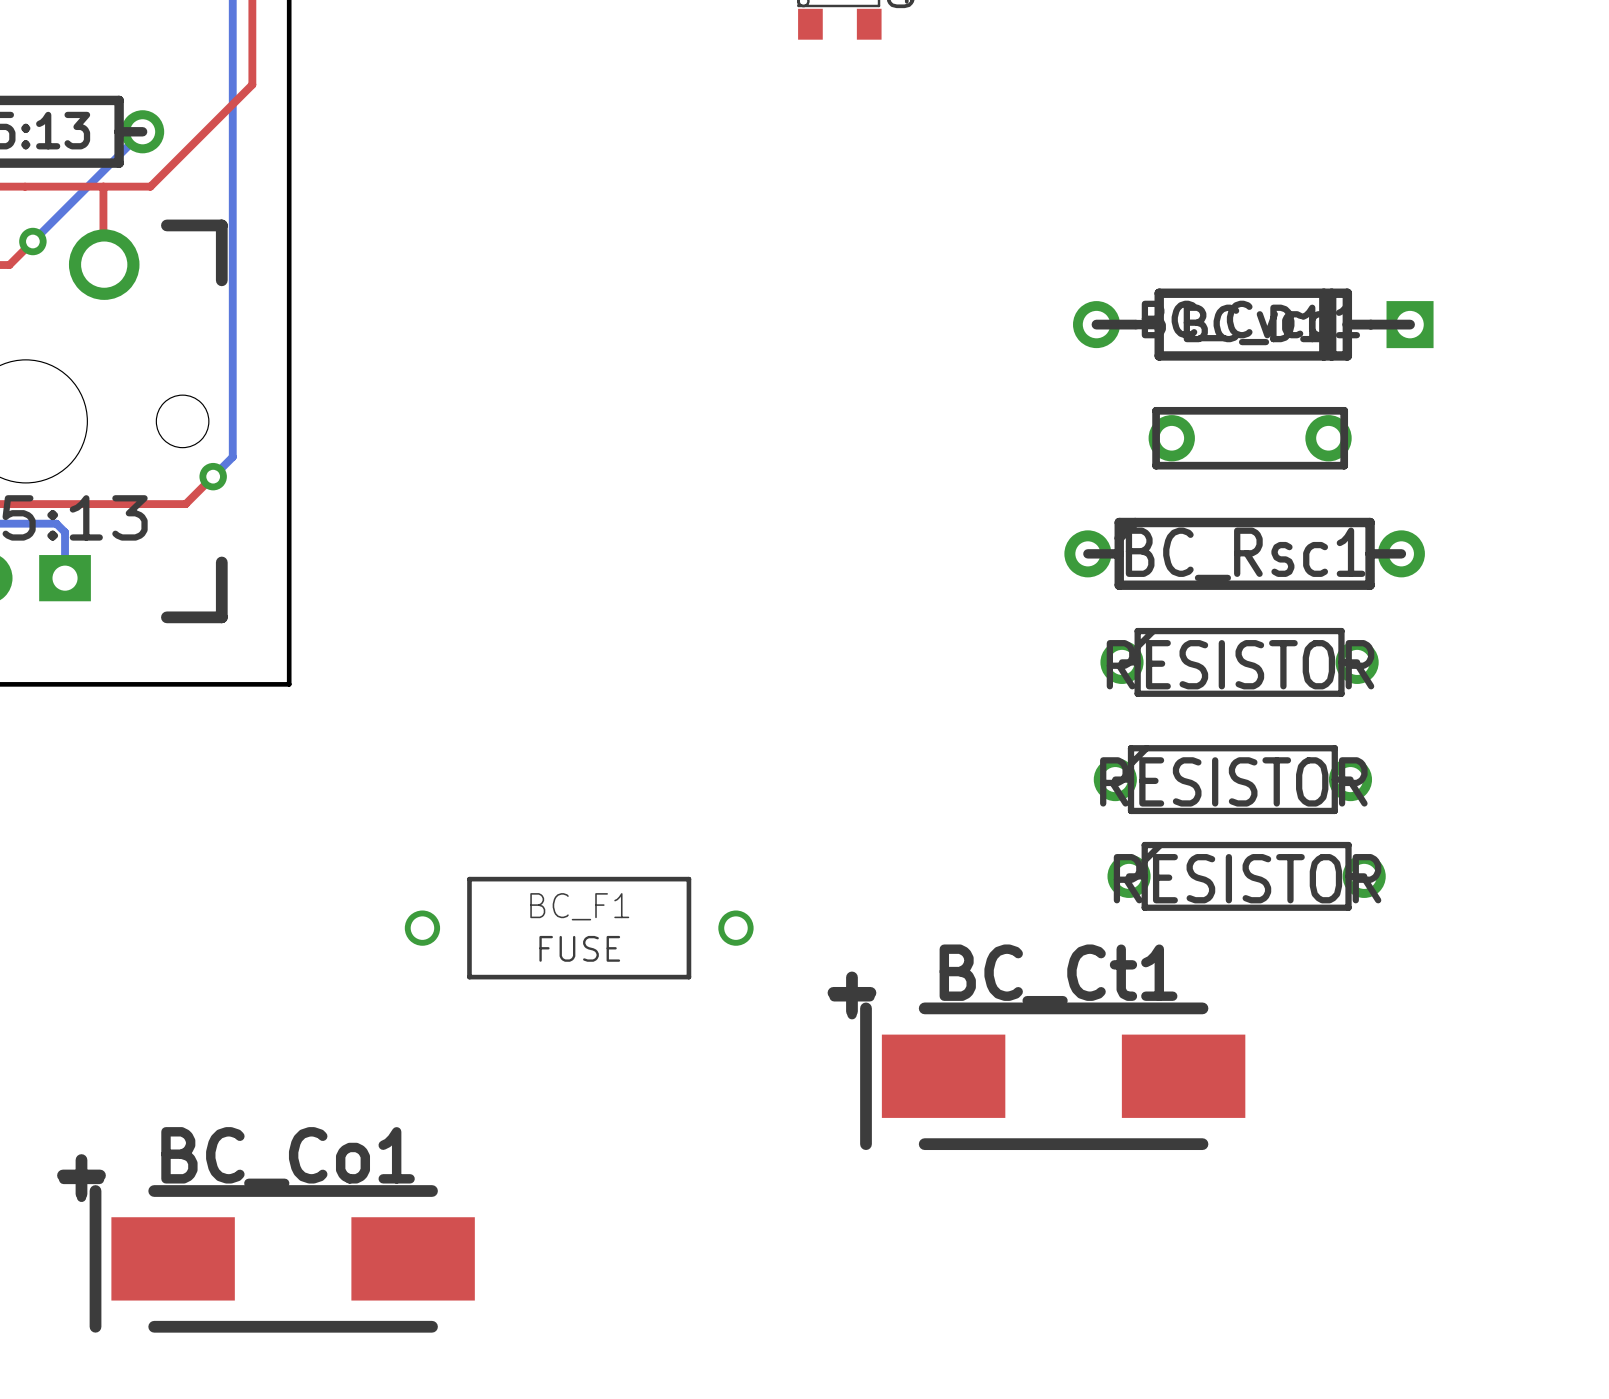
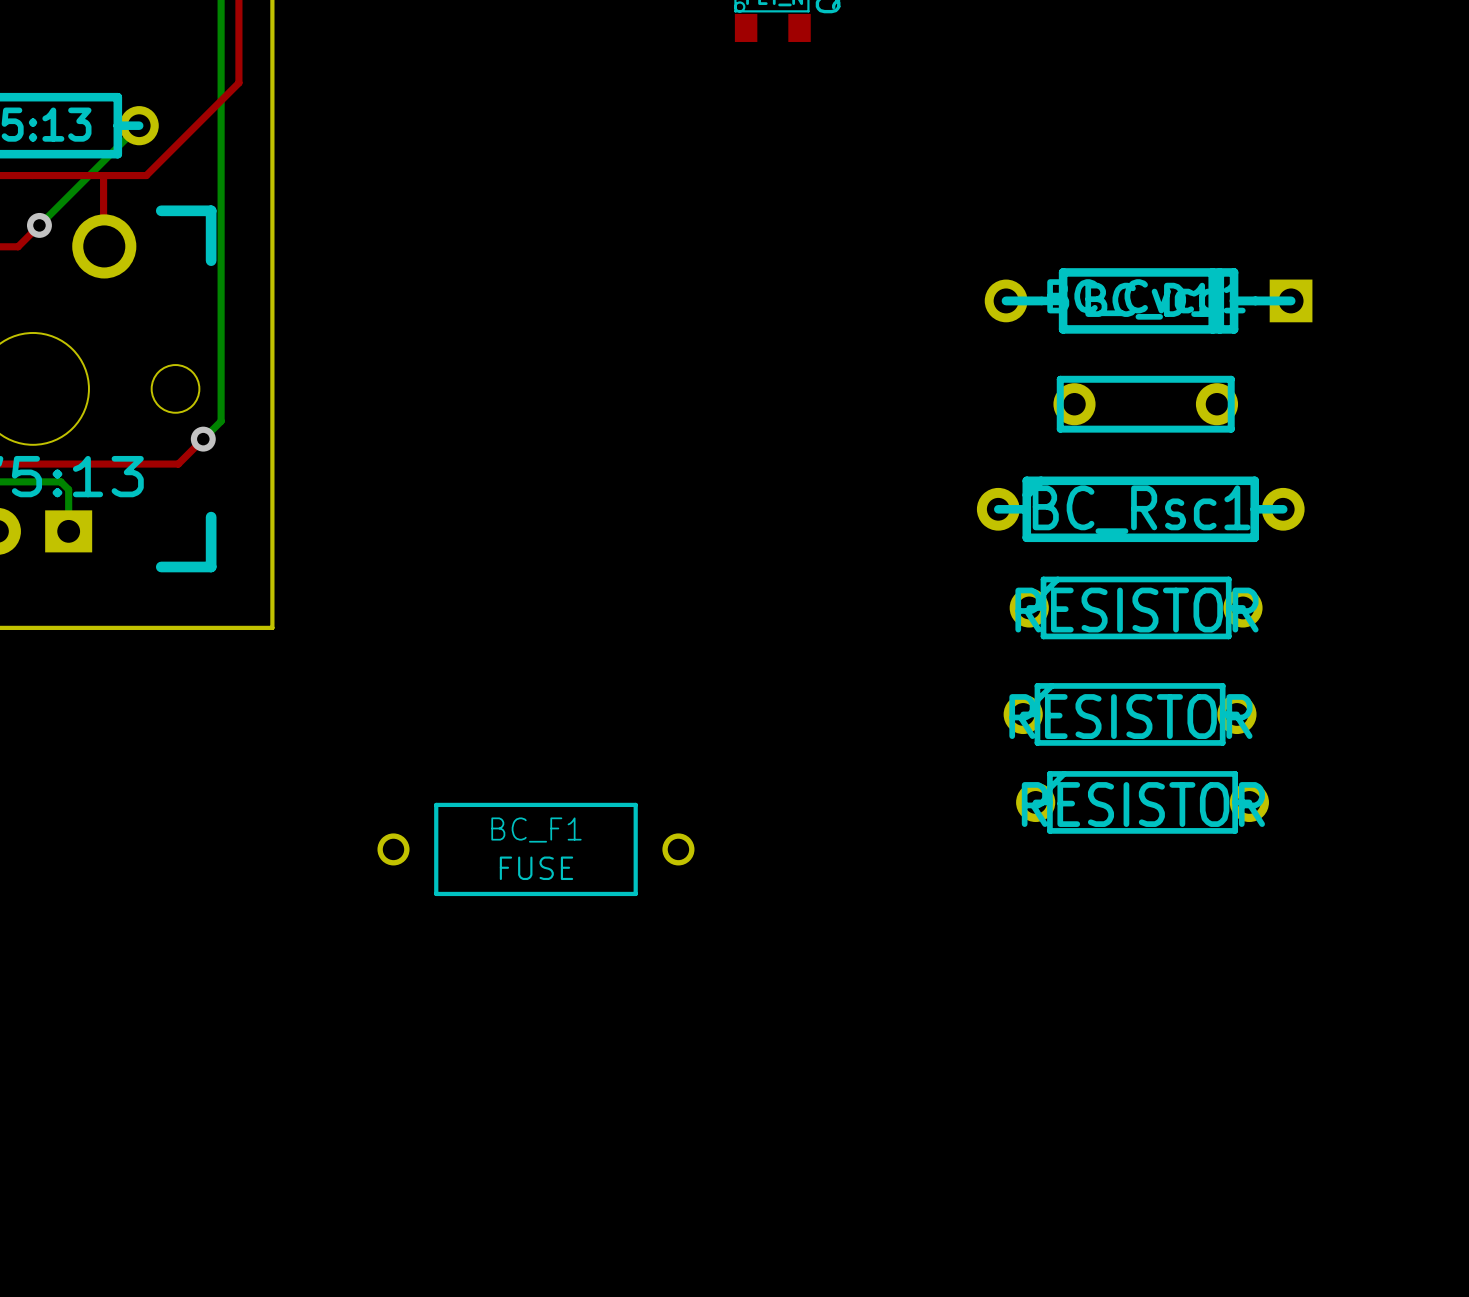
BC_Ct1: (1036, 1060) -> none
BC_Co1: (265, 1243) -> none

